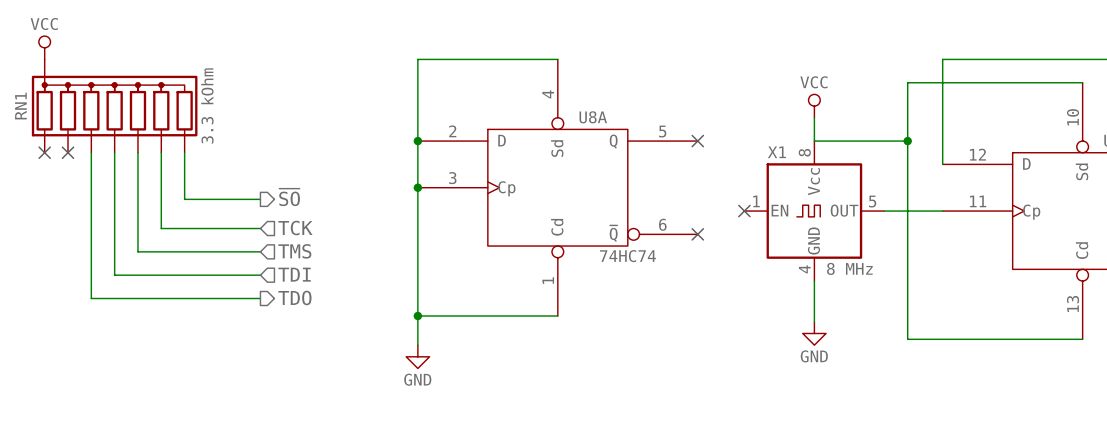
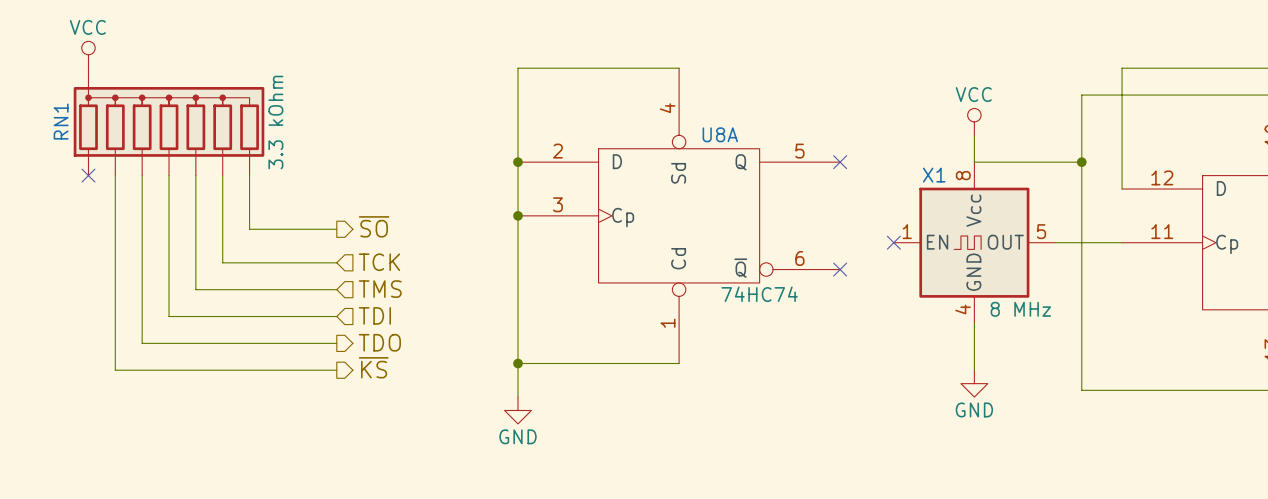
wire: none -> (115, 175) (115, 370) (336, 370)
no-connect mark: (68, 152) -> none
hierarchical label: none -> ~{KS} (373, 367)

